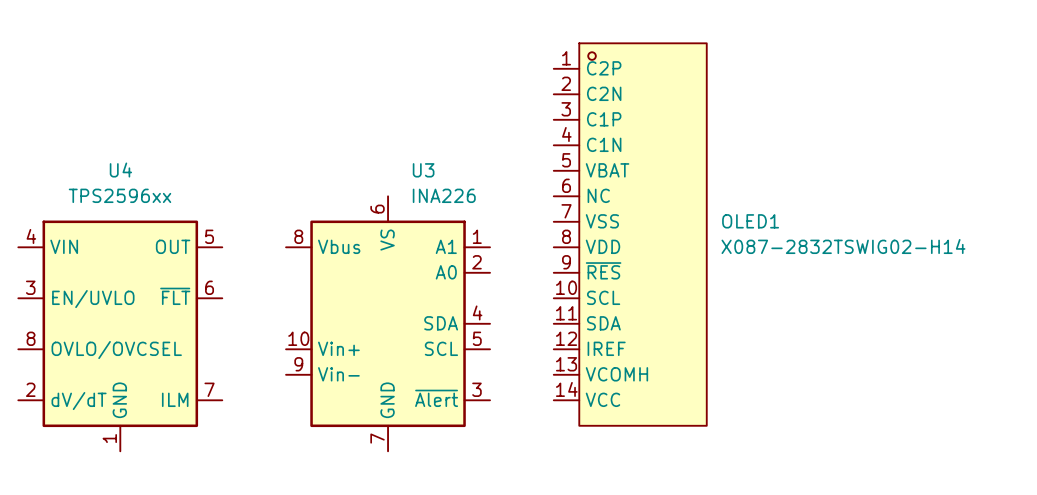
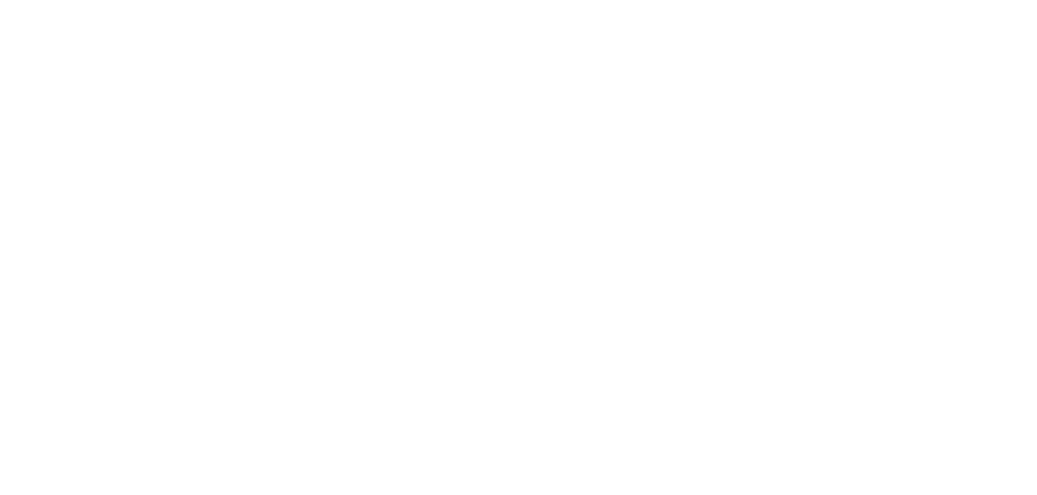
OLED1: X087-2832TSWIG02-H14 (630, 234) -> none
U3: INA226 (388, 323) -> none
U4: TPS2596xx (120, 335) -> none

